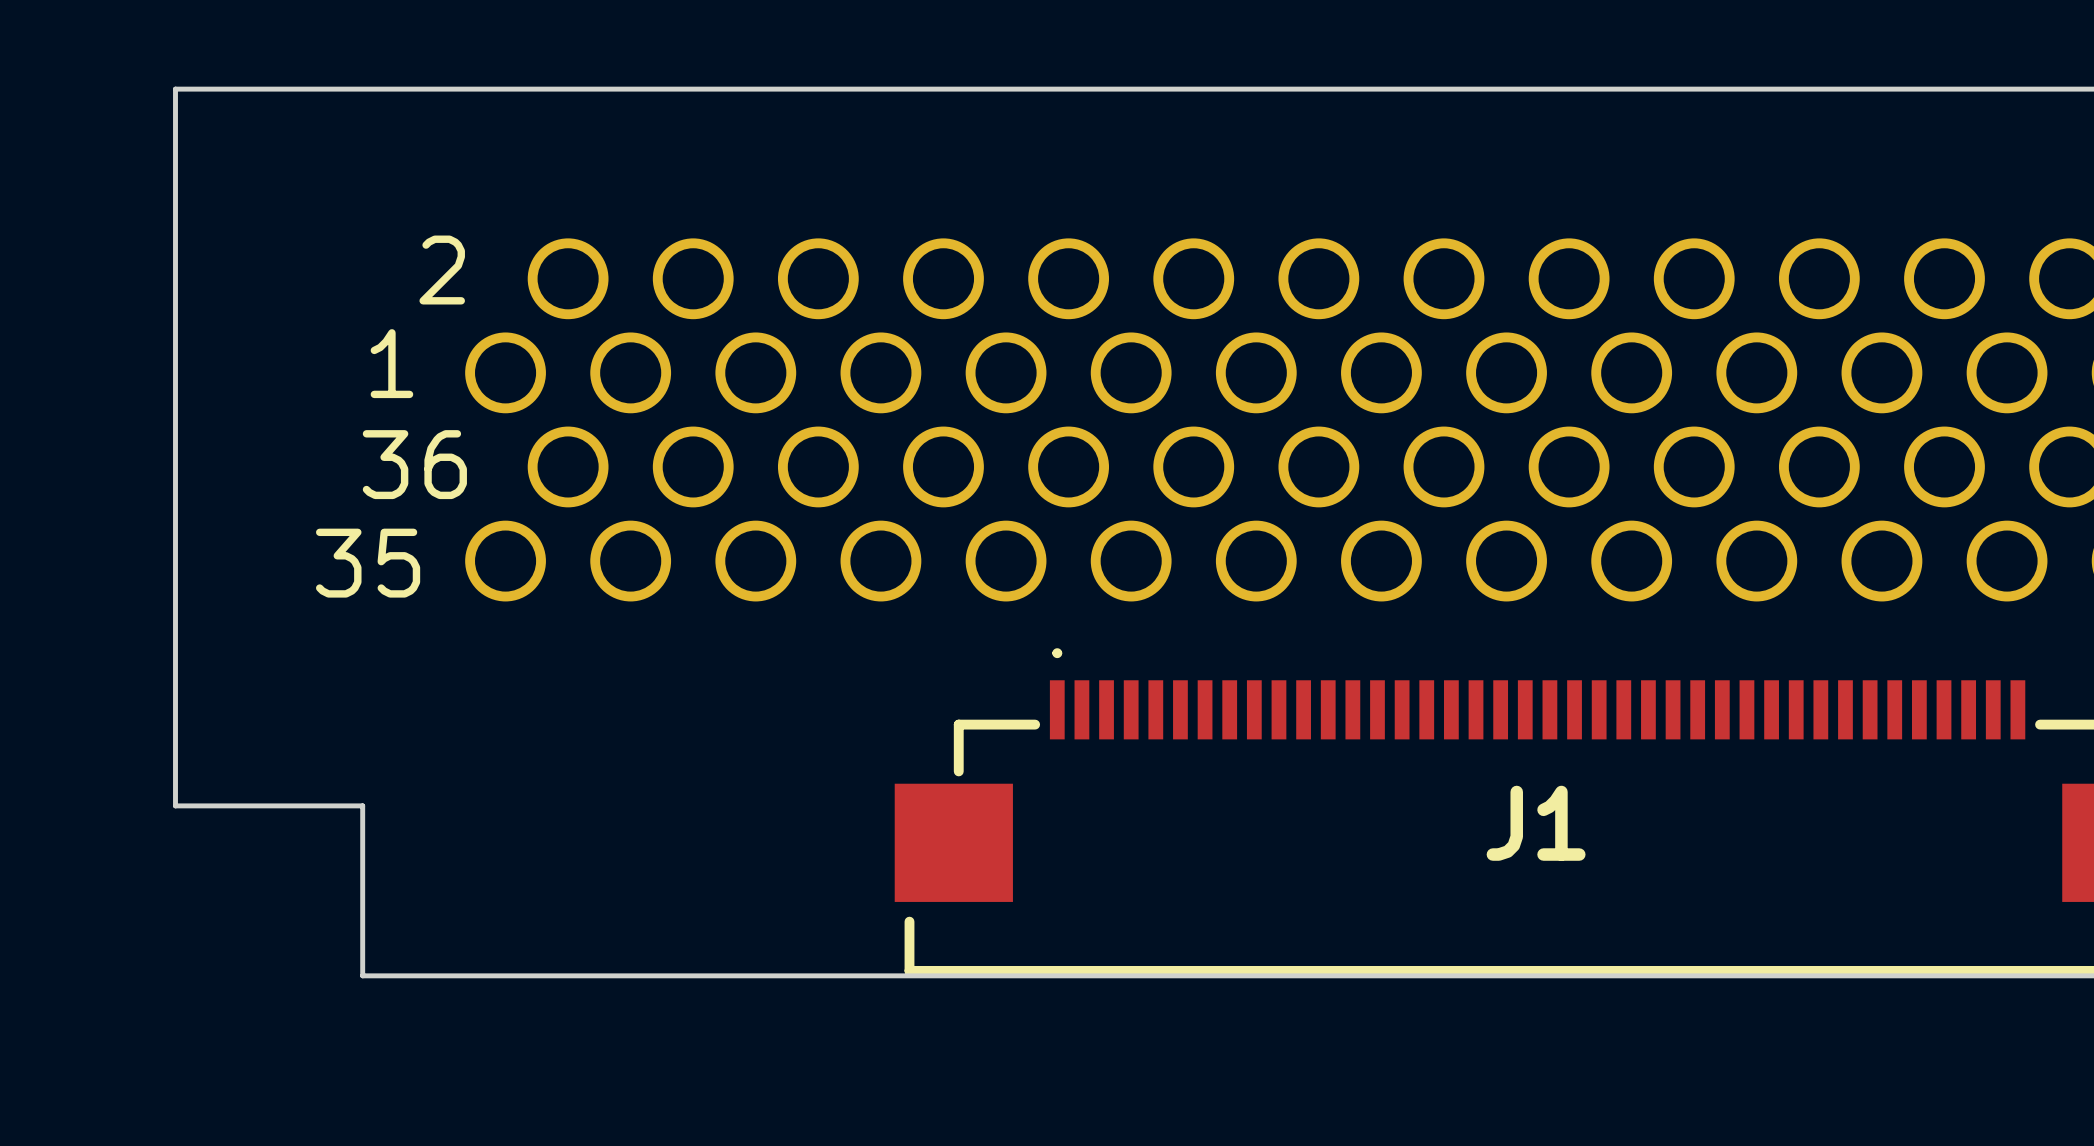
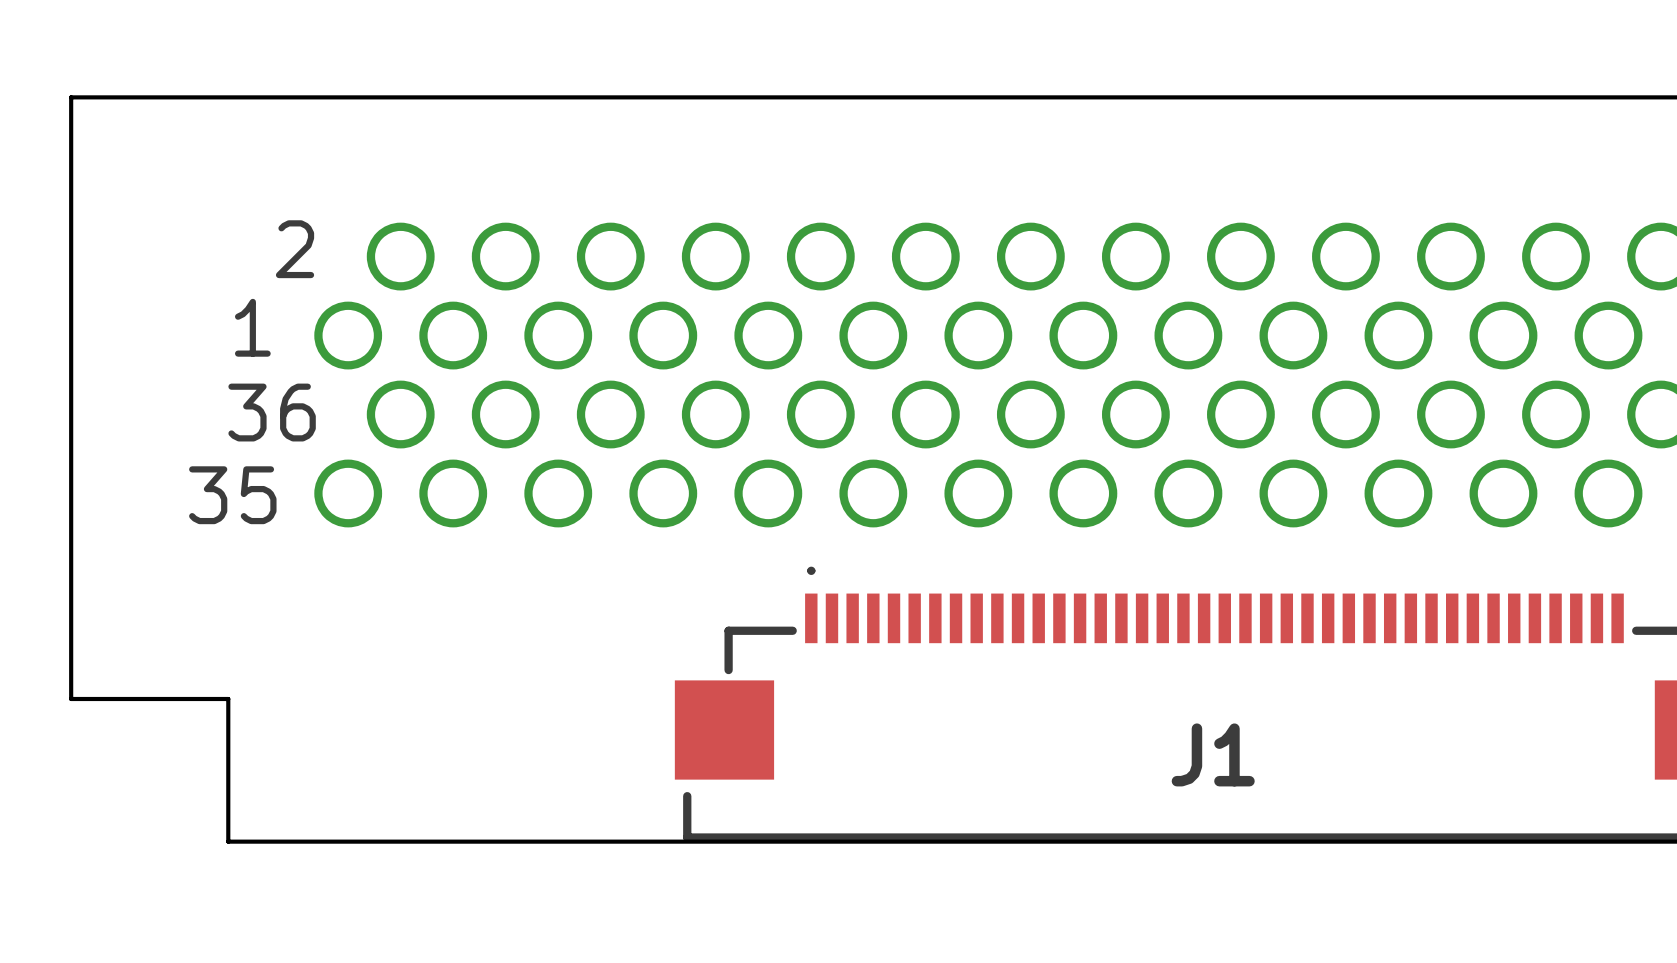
J1 name position: J1 (1536, 823) -> J1 (1213, 754)

